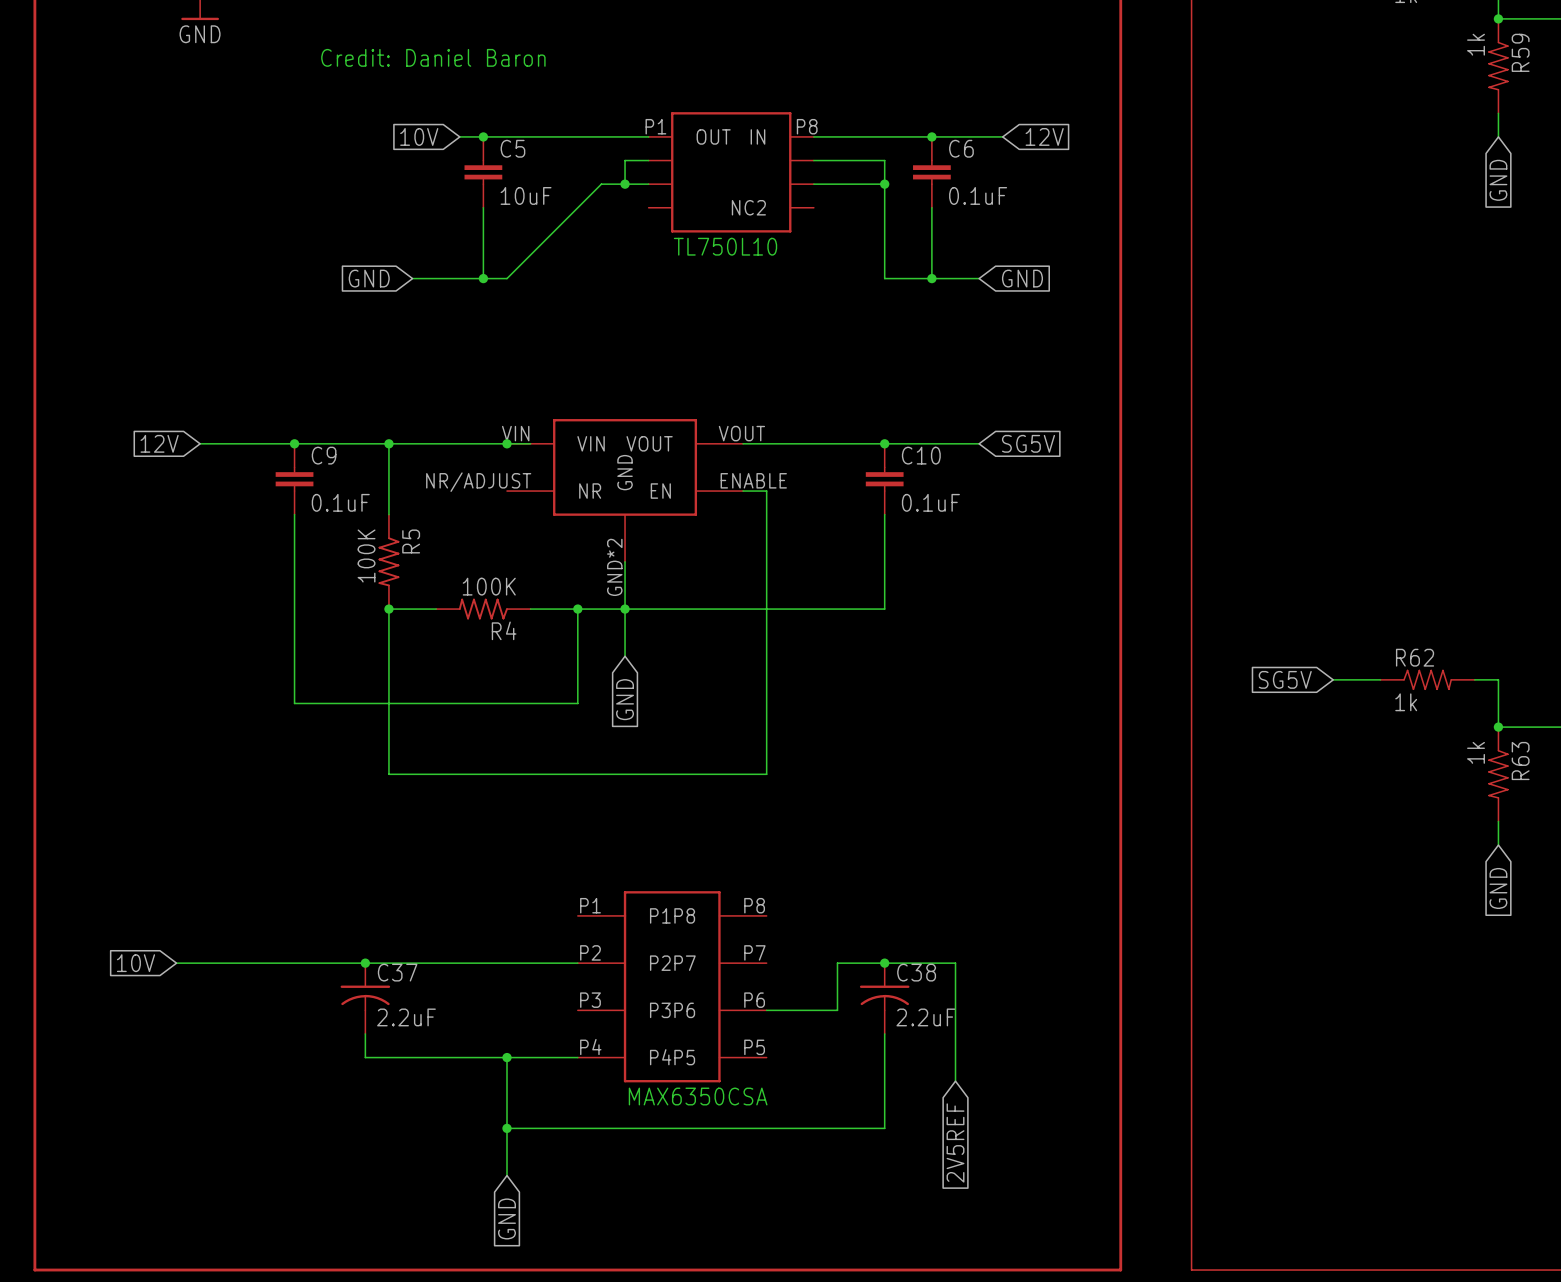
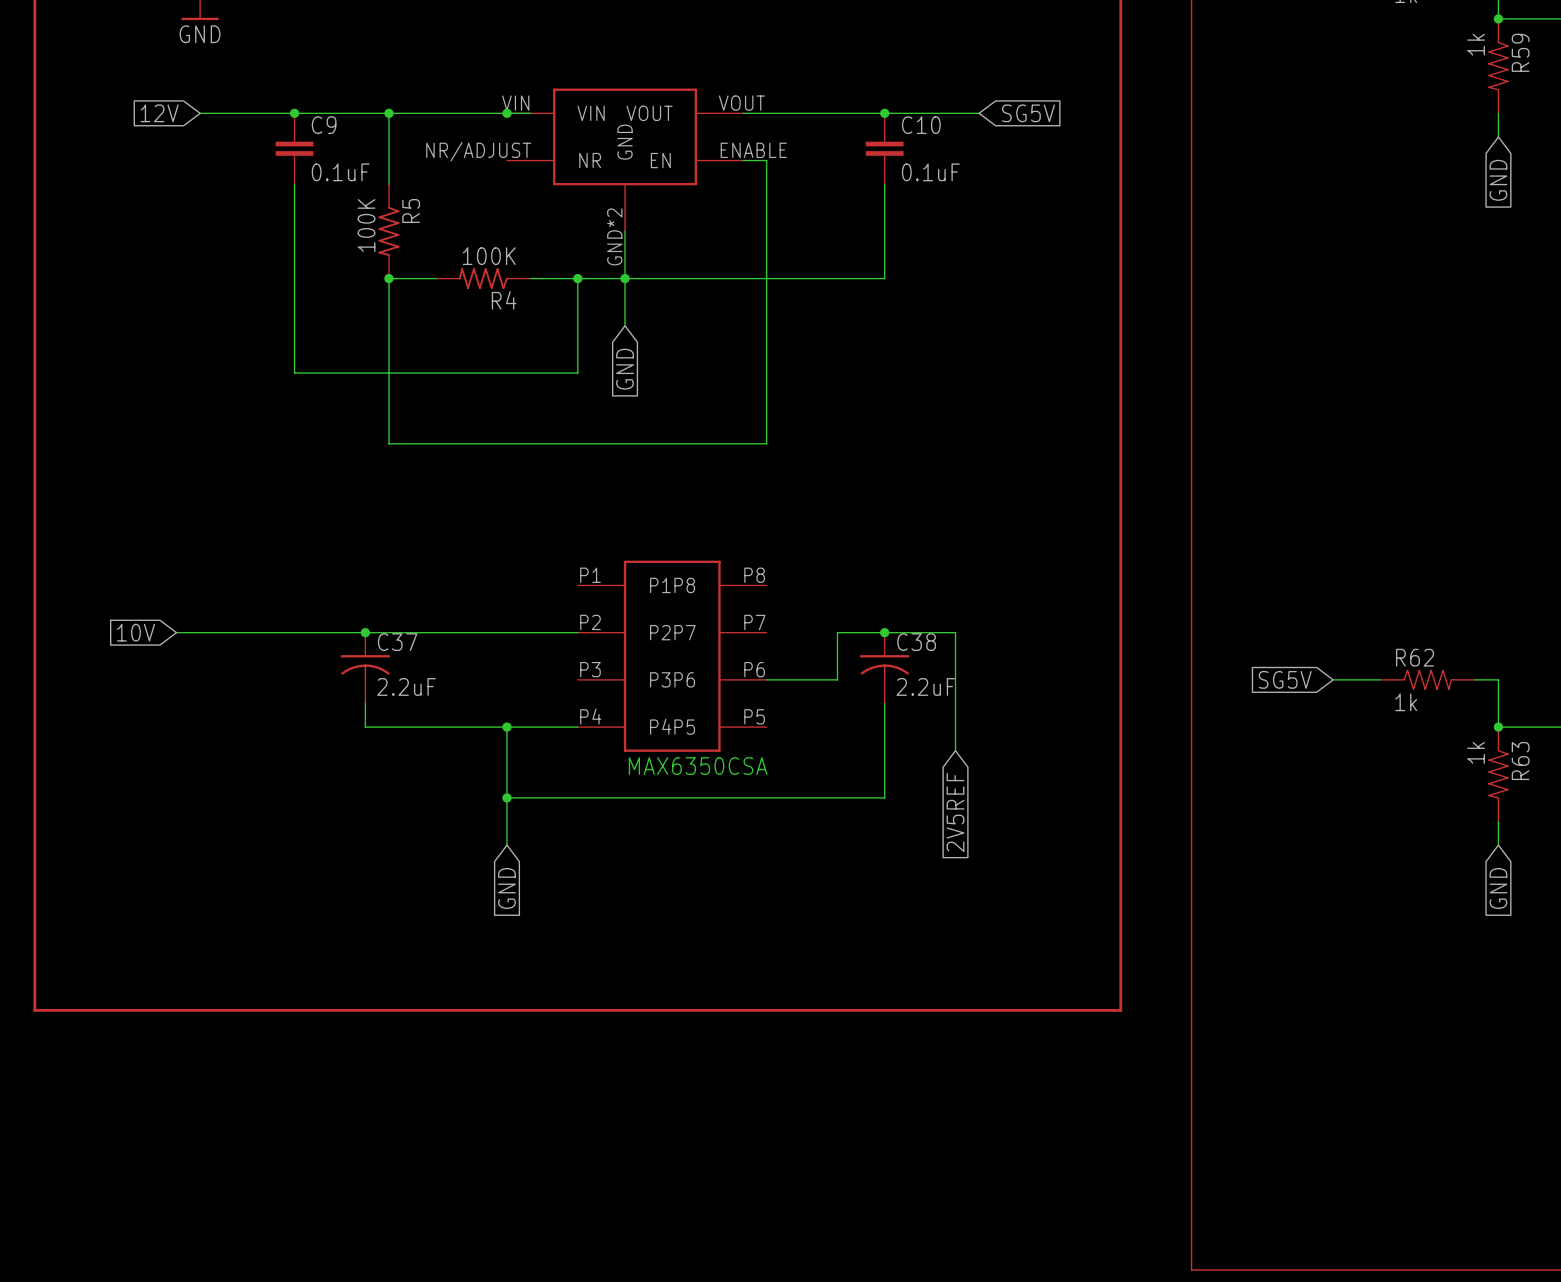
text: Credit: Daniel Baron (433, 57) -> none
global label: none -> 12V (159, 113)
wire: none -> (200, 113) (530, 113)
junction: none -> (294, 113)
junction: none -> (388, 113)
wire: none -> (743, 113) (979, 113)
junction: none -> (884, 113)
global label: none -> SG5V (1028, 113)
global label: 10V (419, 136) -> none
wire: (459, 136) (648, 136) -> none
junction position: (483, 136) -> (507, 113)
wire: (813, 136) (1002, 136) -> none
junction: (931, 136) -> none
global label: 12V (1044, 136) -> none
part: none -> (625, 159)
wire: (648, 160) (625, 160) (625, 184) -> none
wire: (813, 160) (884, 160) (884, 184) (813, 184) -> none
C5: 10uF (483, 172) -> none
part: (731, 172) -> none
C6: 0.1uF (931, 172) -> none
wire: none -> (294, 184) (294, 373) (577, 373) (577, 278)
junction: (625, 184) -> none
wire: (648, 184) (601, 184) (507, 278) (436, 278) -> none
junction: (884, 184) -> none
wire: (483, 207) (483, 278) -> (388, 113) (388, 184)
wire: (931, 207) (931, 278) -> none
wire: none -> (625, 231) (625, 325)
text: TL750L10 (725, 246) -> none
global label: GND (369, 278) -> none
junction: none -> (388, 278)
wire: none -> (412, 278) (388, 278) (388, 443)
junction: (483, 278) -> none
junction: none -> (577, 278)
junction: none -> (625, 278)
wire: (884, 278) (979, 278) -> (884, 278) (530, 278)
junction: (931, 278) -> none
global label: GND (1022, 278) -> none
global label: none -> GND (625, 369)
global label: 12V (159, 443) -> none
wire: (200, 443) (388, 443) (388, 514) -> none
junction: (294, 443) -> none
junction: (388, 443) -> none
junction: (507, 443) -> none
wire: none -> (530, 443) (743, 443)
wire: (766, 443) (979, 443) -> (766, 443) (766, 160) (743, 160)
junction: (884, 443) -> none
global label: SG5V (1028, 443) -> none
C9 position: (294, 479) -> (294, 148)
C10 position: (884, 479) -> (884, 148)
part: (625, 490) -> none
wire: (743, 491) (766, 491) (766, 774) (388, 774) (388, 609) (436, 609) -> none
wire: (294, 514) (294, 703) (577, 703) (577, 609) -> none
wire: (884, 514) (884, 609) (530, 609) -> none
R5 position: (388, 561) -> (388, 231)
junction position: (388, 609) -> (365, 632)
R4 position: (483, 609) -> (483, 278)
junction: (577, 609) -> none
junction: (625, 609) -> none
global label: none -> 10V (135, 632)
wire: none -> (176, 632) (577, 632)
junction: none -> (884, 632)
part: none -> (672, 656)
wire: none -> (766, 679) (837, 679) (837, 632) (955, 632) (955, 750)
global label: GND (625, 699) -> none
wire: none -> (365, 703) (365, 727) (577, 727)
wire: none -> (884, 703) (884, 797) (507, 797)
wire: none -> (507, 727) (507, 845)
junction: none -> (507, 727)
text: none -> MAX6350CSA (698, 766)
junction: none -> (507, 797)
global label: none -> 2V5REF (955, 812)
global label: none -> GND (507, 888)
global label: 10V (135, 963) -> none
wire: (176, 963) (577, 963) -> none
junction: (365, 963) -> none
junction: (884, 963) -> none
part: (672, 986) -> none
C37 position: (365, 998) -> (365, 668)
C38 position: (884, 998) -> (884, 668)
line: (34, 1010) (34, 1270) (1120, 1270) (1120, 1010) -> (34, 1010) (1120, 1010)
wire: (766, 1010) (837, 1010) (837, 963) (955, 963) (955, 1081) -> none
wire: (365, 1033) (365, 1057) (577, 1057) -> none
wire: (884, 1033) (884, 1128) (507, 1128) -> none
wire: (507, 1057) (507, 1175) -> none
junction: (507, 1057) -> none
text: MAX6350CSA (698, 1096) -> none
junction: (507, 1128) -> none
global label: 2V5REF (955, 1142) -> none
global label: GND (507, 1218) -> none

